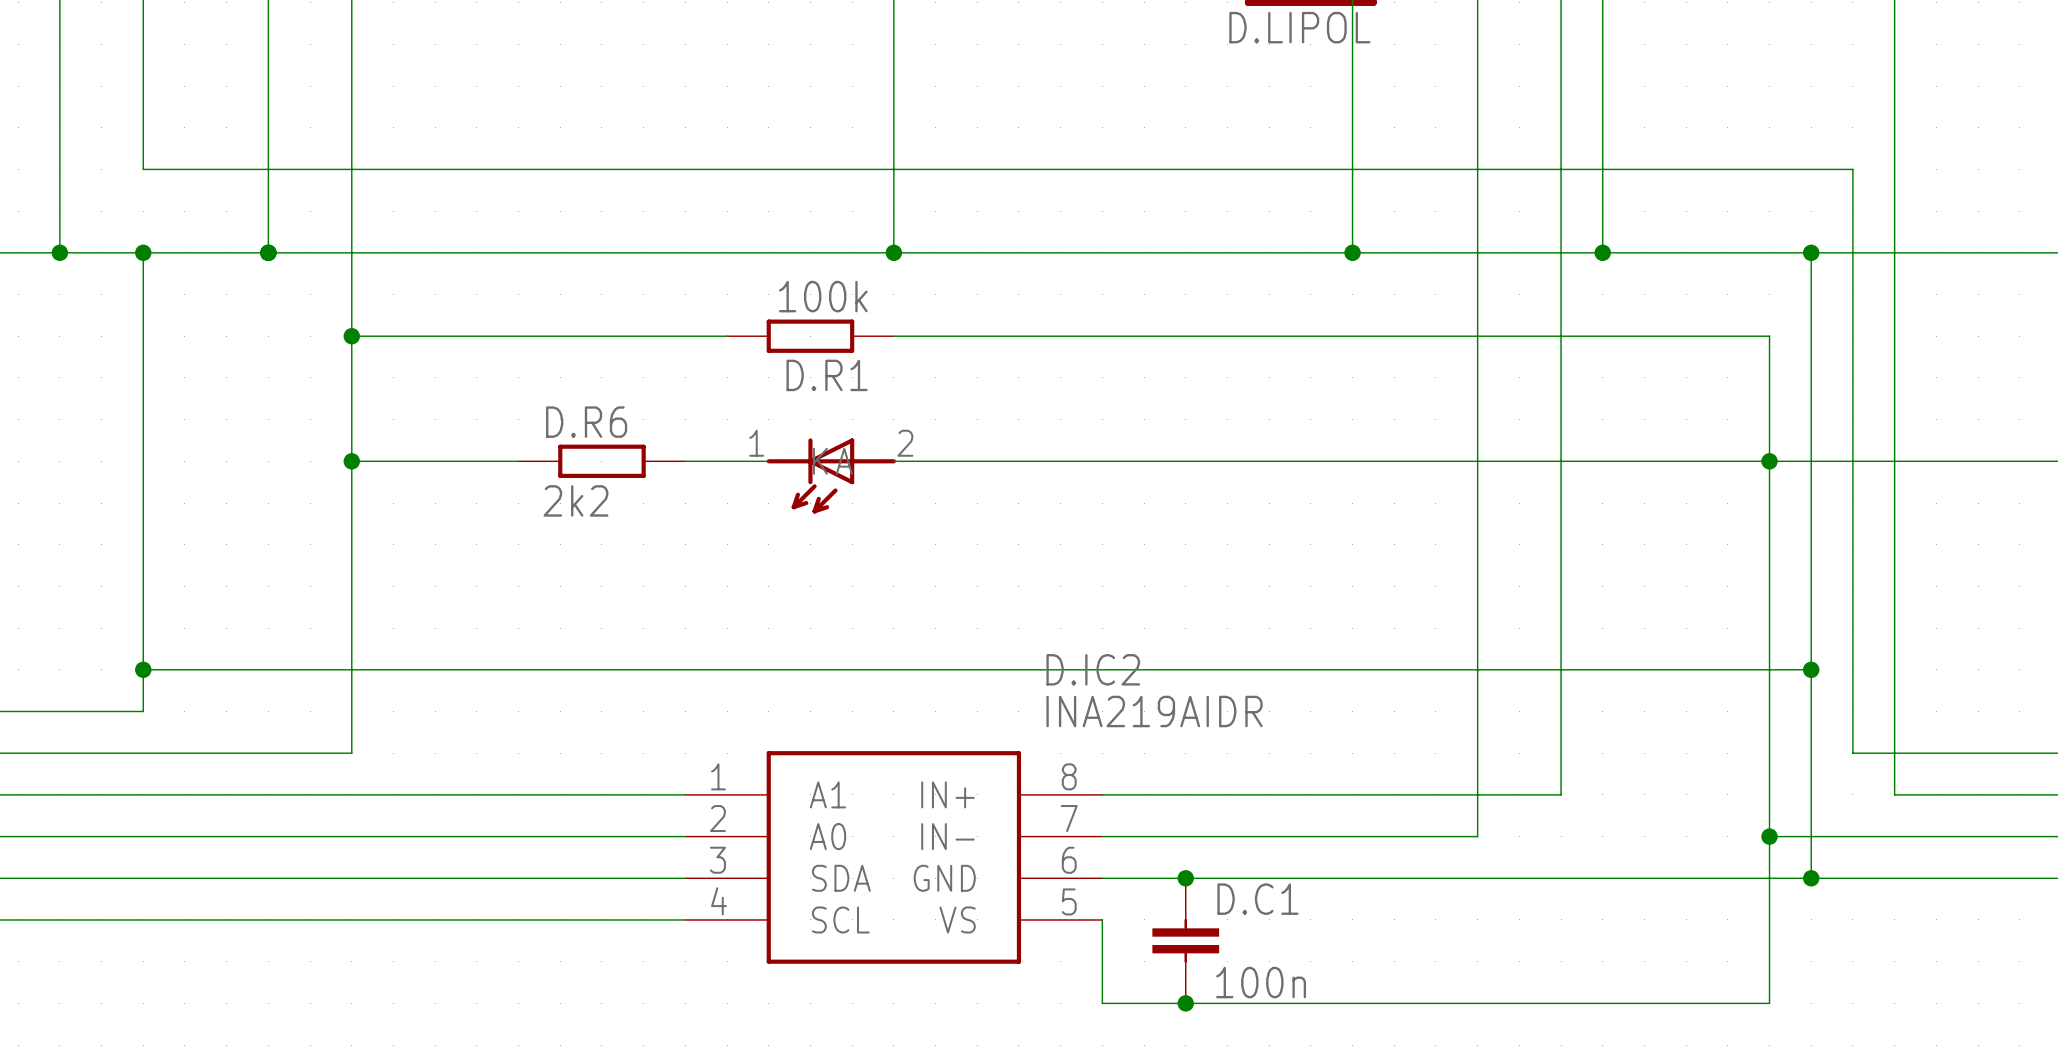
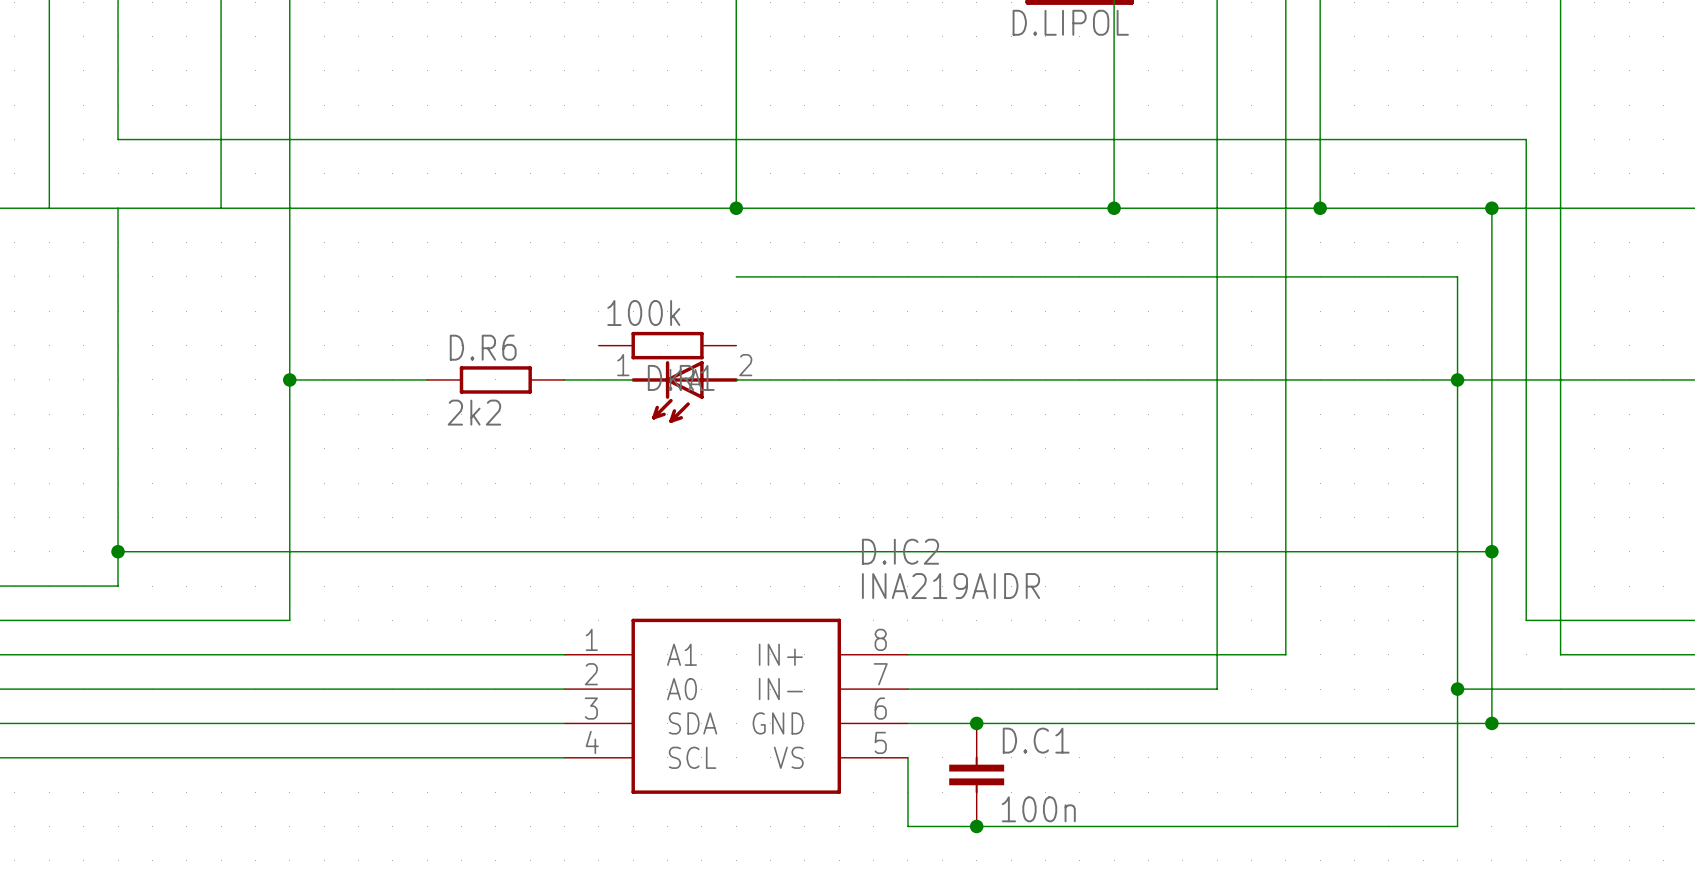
junction: (59, 252) -> none
junction: (143, 252) -> none
junction: (268, 252) -> none
D.R1 value position: 100k (823, 296) -> 100k (643, 313)
wire: (351, 336) (727, 336) -> none
junction: (351, 336) -> none
D.R1 position: (810, 336) -> (667, 345)

